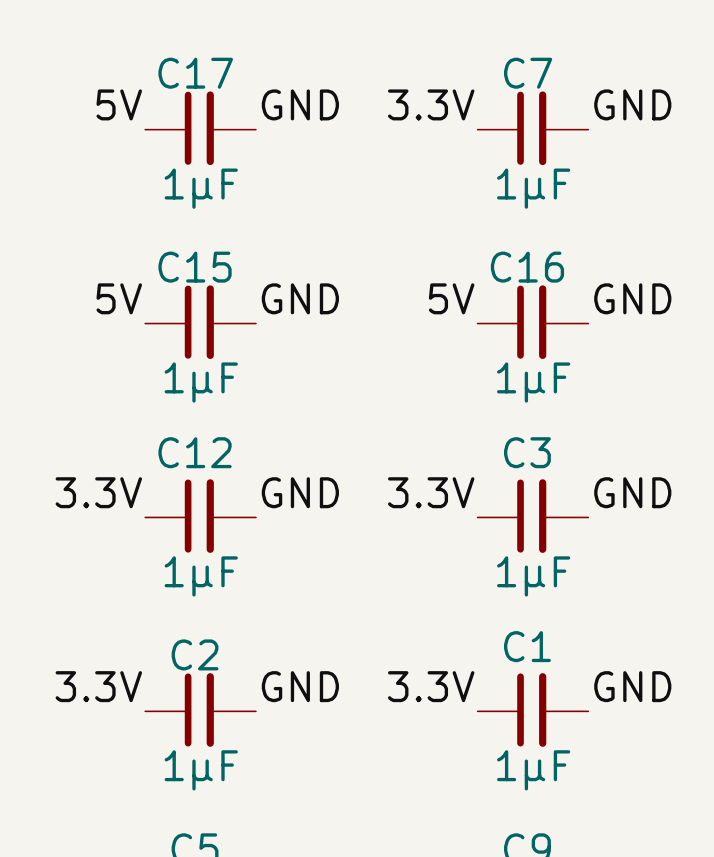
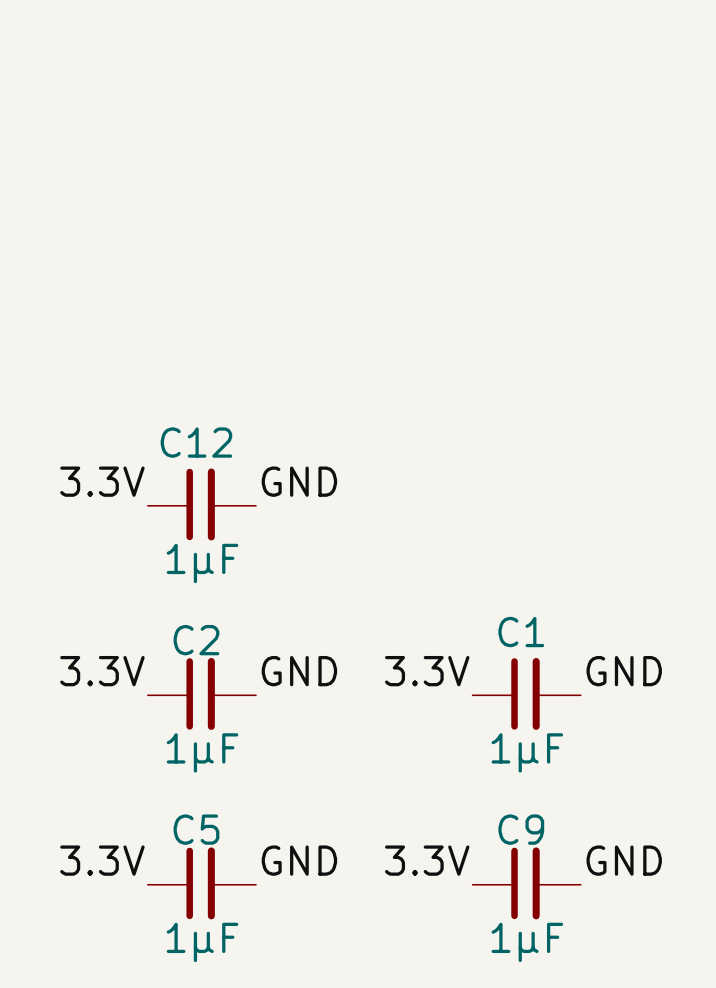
label: 5V (119, 104) -> none
label: GND (300, 104) -> none
label: 3.3V (431, 104) -> none
label: GND (632, 104) -> none
C17: 1μF (200, 128) -> none
C7: 1μF (532, 128) -> none
label: 5V (119, 298) -> none
label: GND (300, 298) -> none
label: 5V (451, 298) -> none
label: GND (632, 298) -> none
C15: 1μF (200, 322) -> none
C16: 1μF (532, 322) -> none
label: 3.3V (431, 492) -> none
label: GND (632, 492) -> none
C3: 1μF (532, 516) -> none

